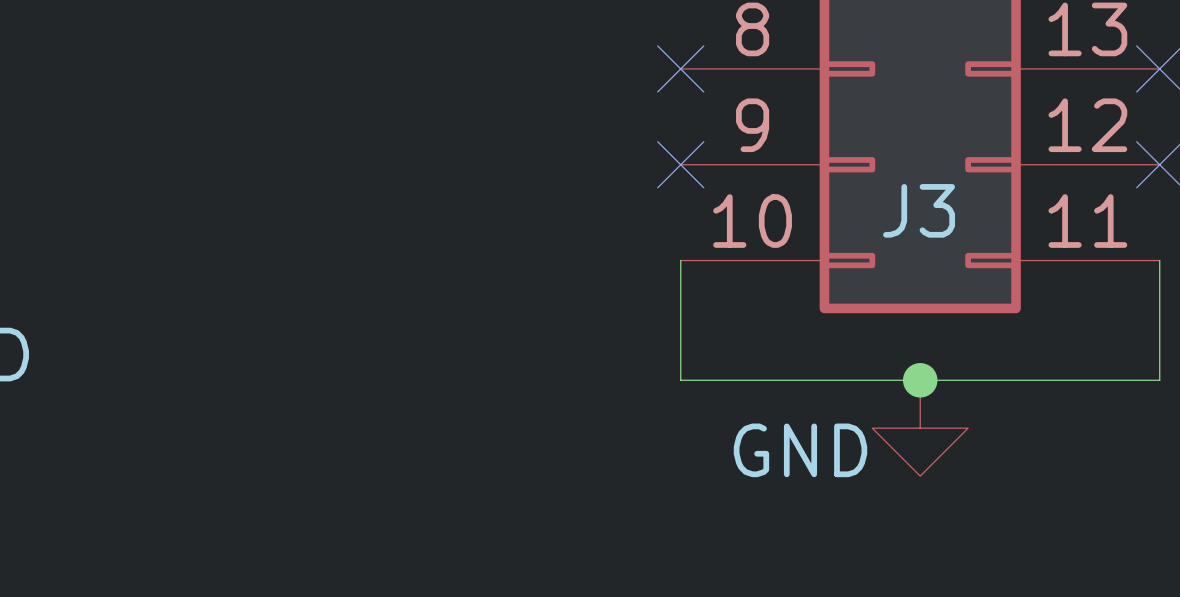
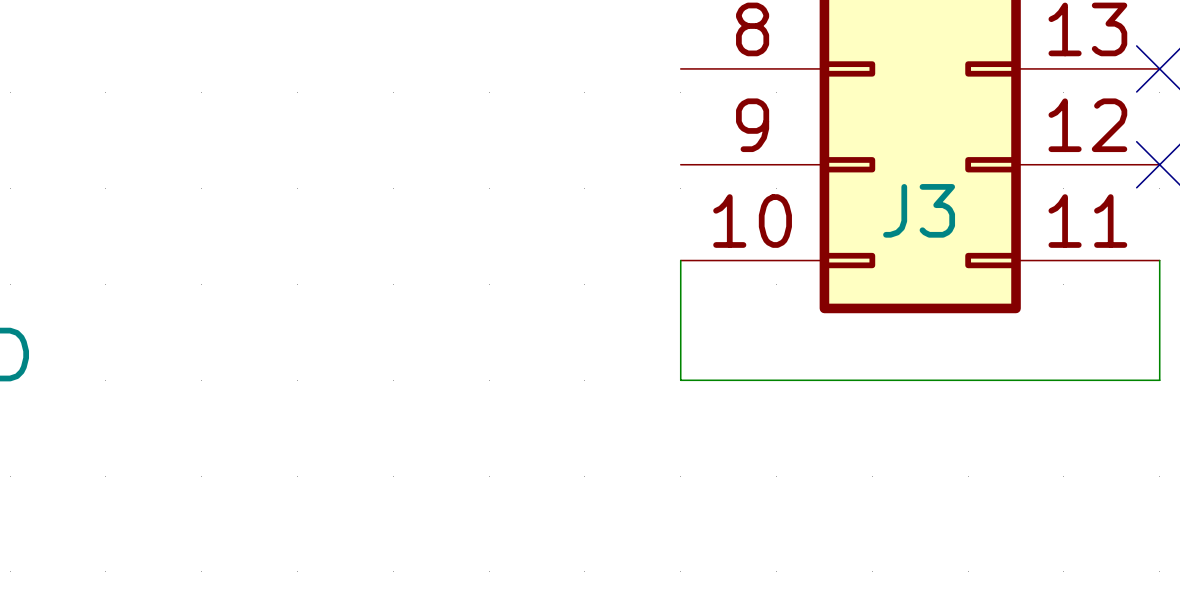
no-connect mark: (680, 68) -> none
no-connect mark: (680, 164) -> none
junction: (920, 380) -> none
power symbol: GND (920, 428) -> none

